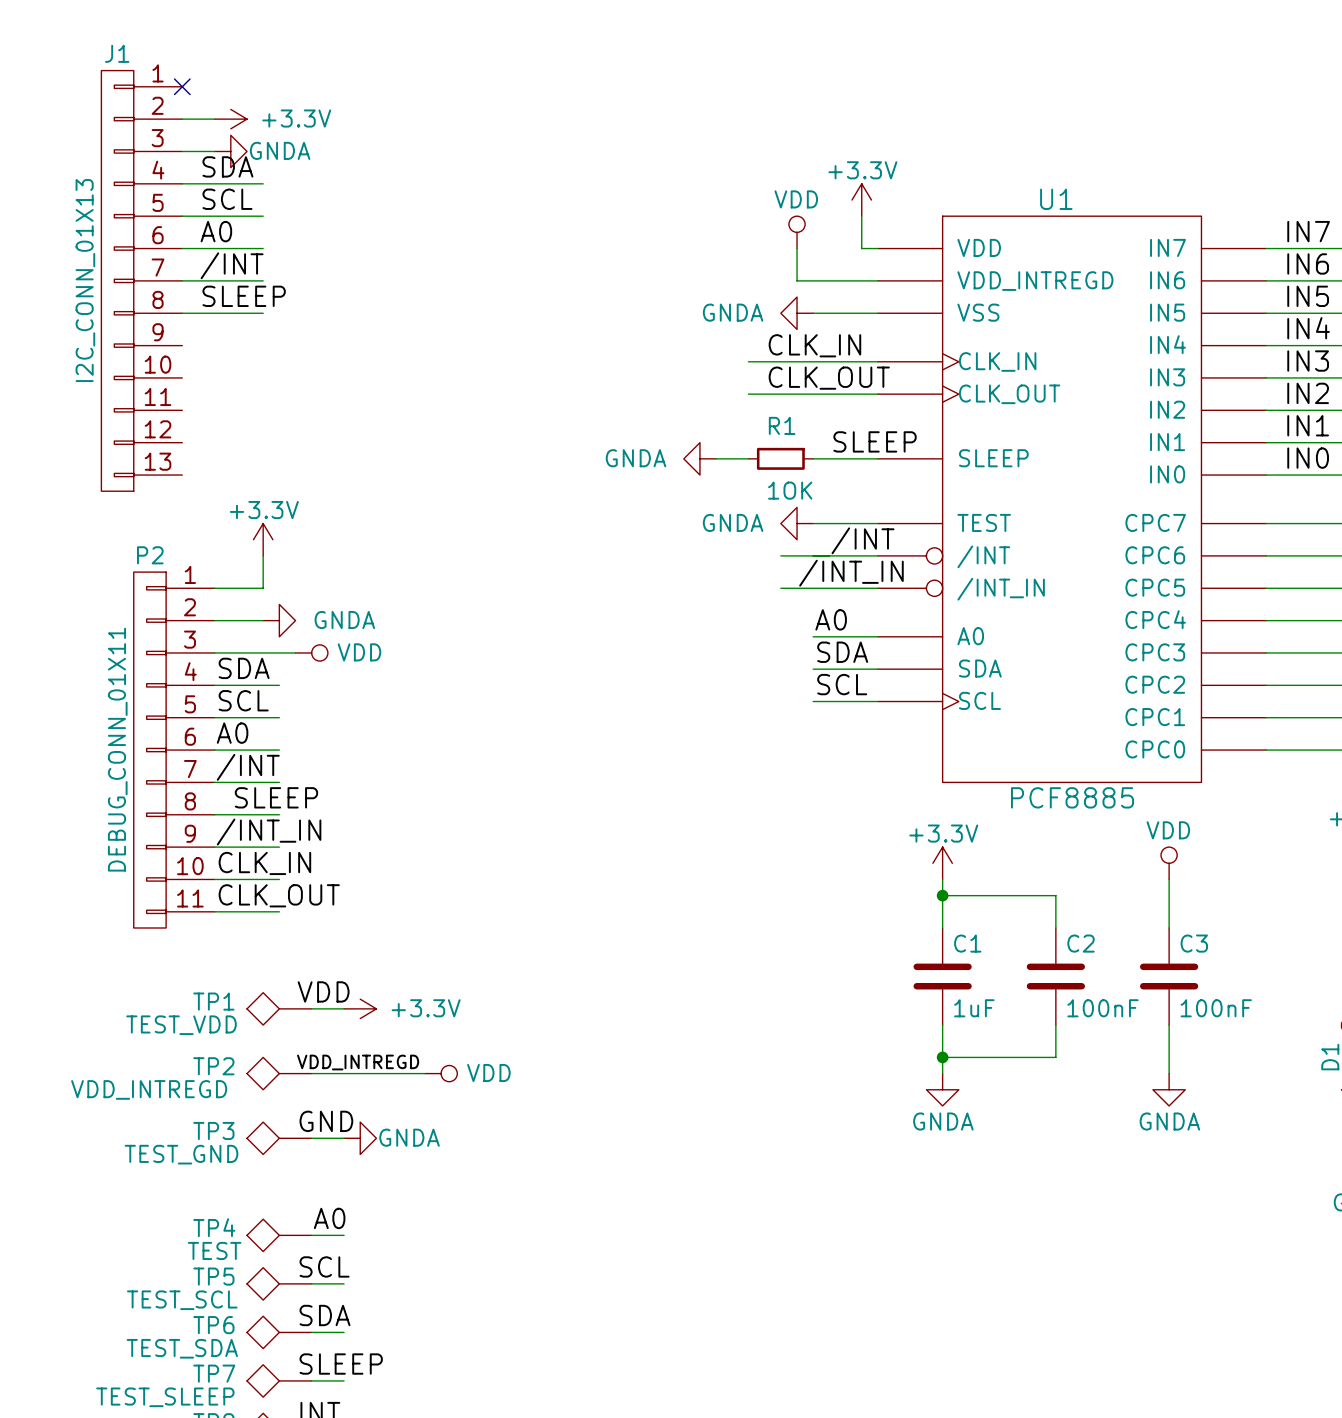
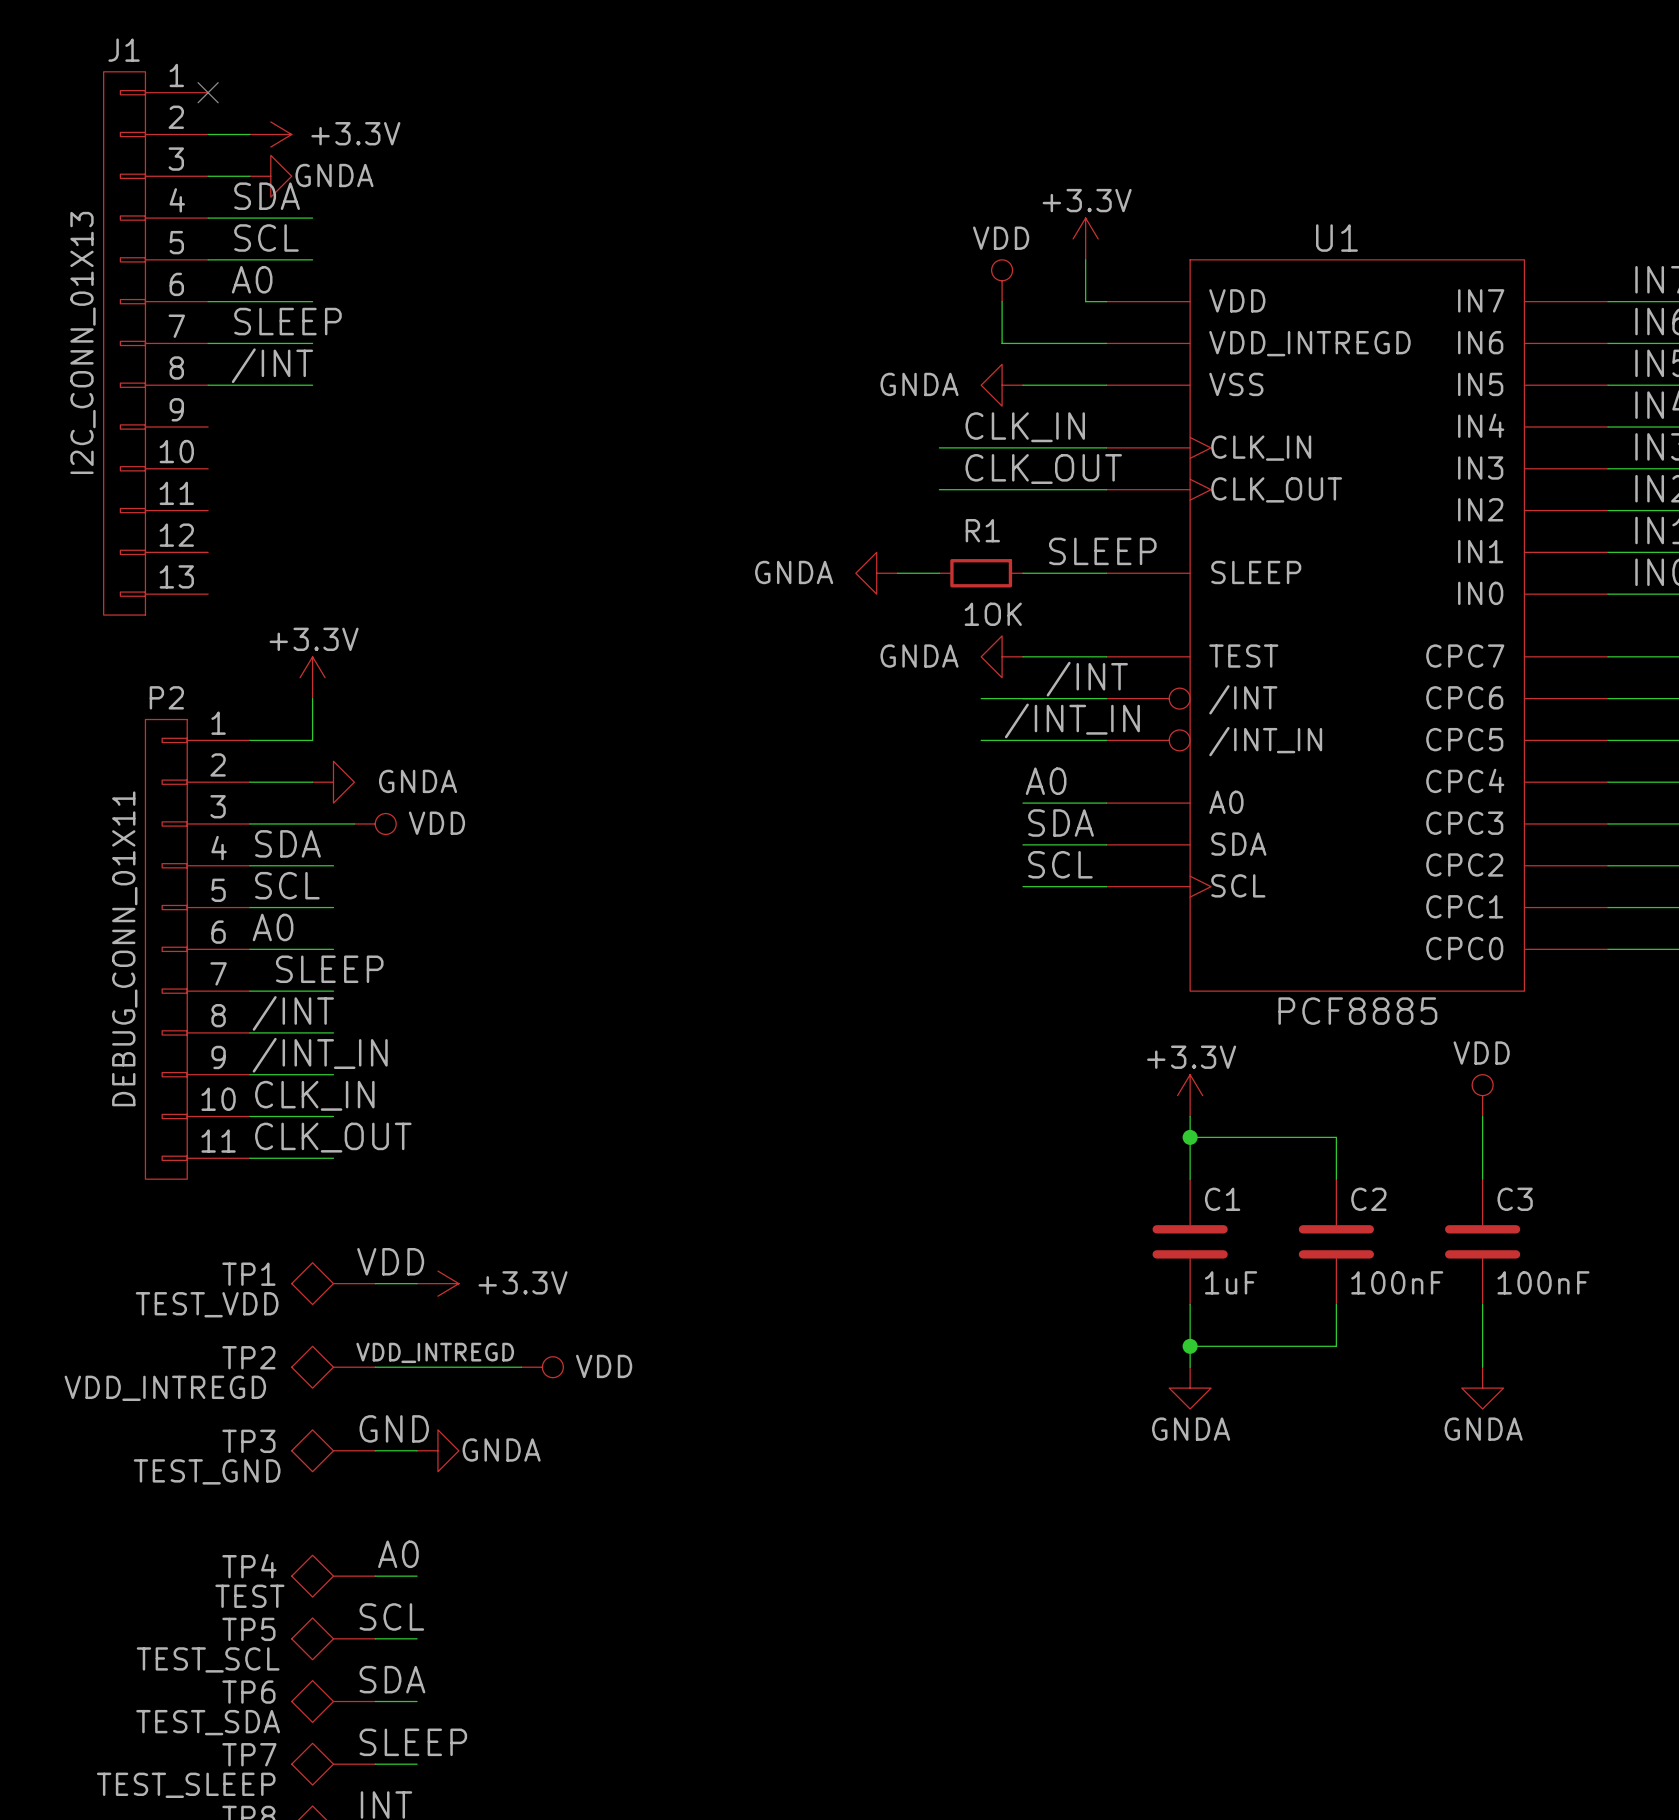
label: /INT (232, 265) -> SLEEP (287, 321)
label: SLEEP (244, 296) -> /INT (272, 365)
label position: /INT (248, 767) -> /INT (293, 1013)
label position: SLEEP (276, 797) -> SLEEP (329, 969)

